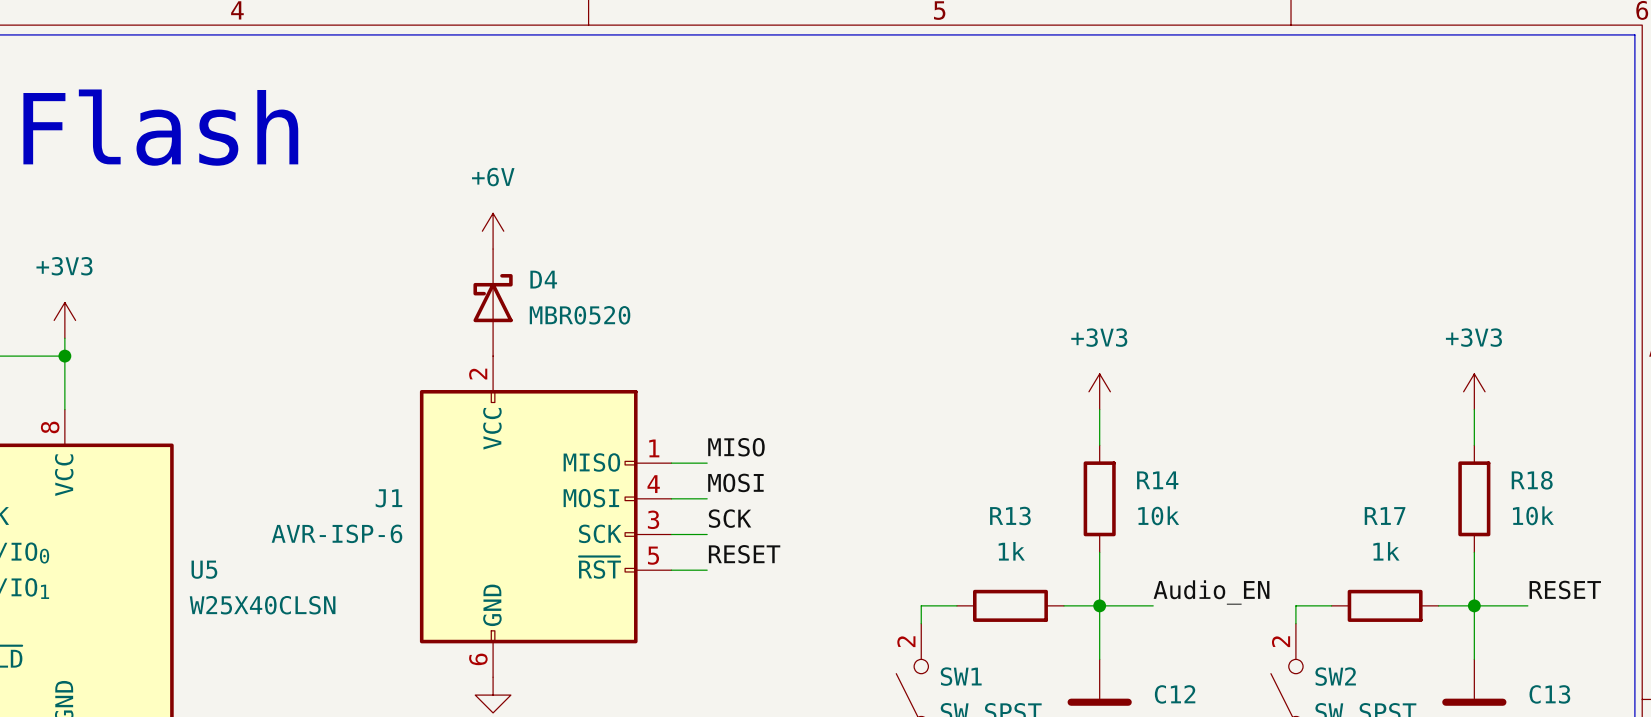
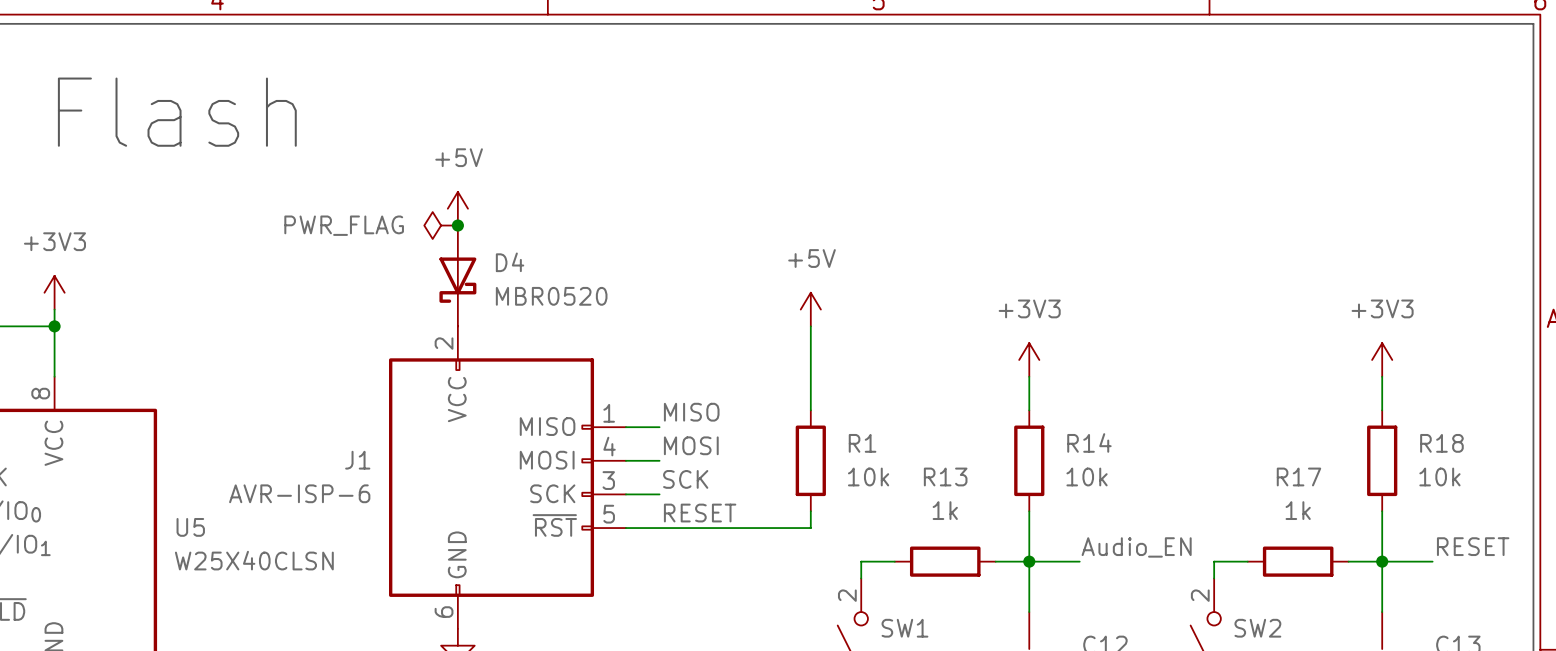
power symbol: +6V (493, 231) -> +5V (457, 208)
power symbol: none -> PWR_FLAG (441, 225)
junction: none -> (457, 225)
D4 rotation: 0° (493, 298) -> 180° (457, 280)
power symbol: none -> +5V (810, 309)
wire: none -> (810, 326) (810, 410)
R1: none -> 10k (810, 460)
wire: none -> (810, 511) (810, 528) (659, 528)

